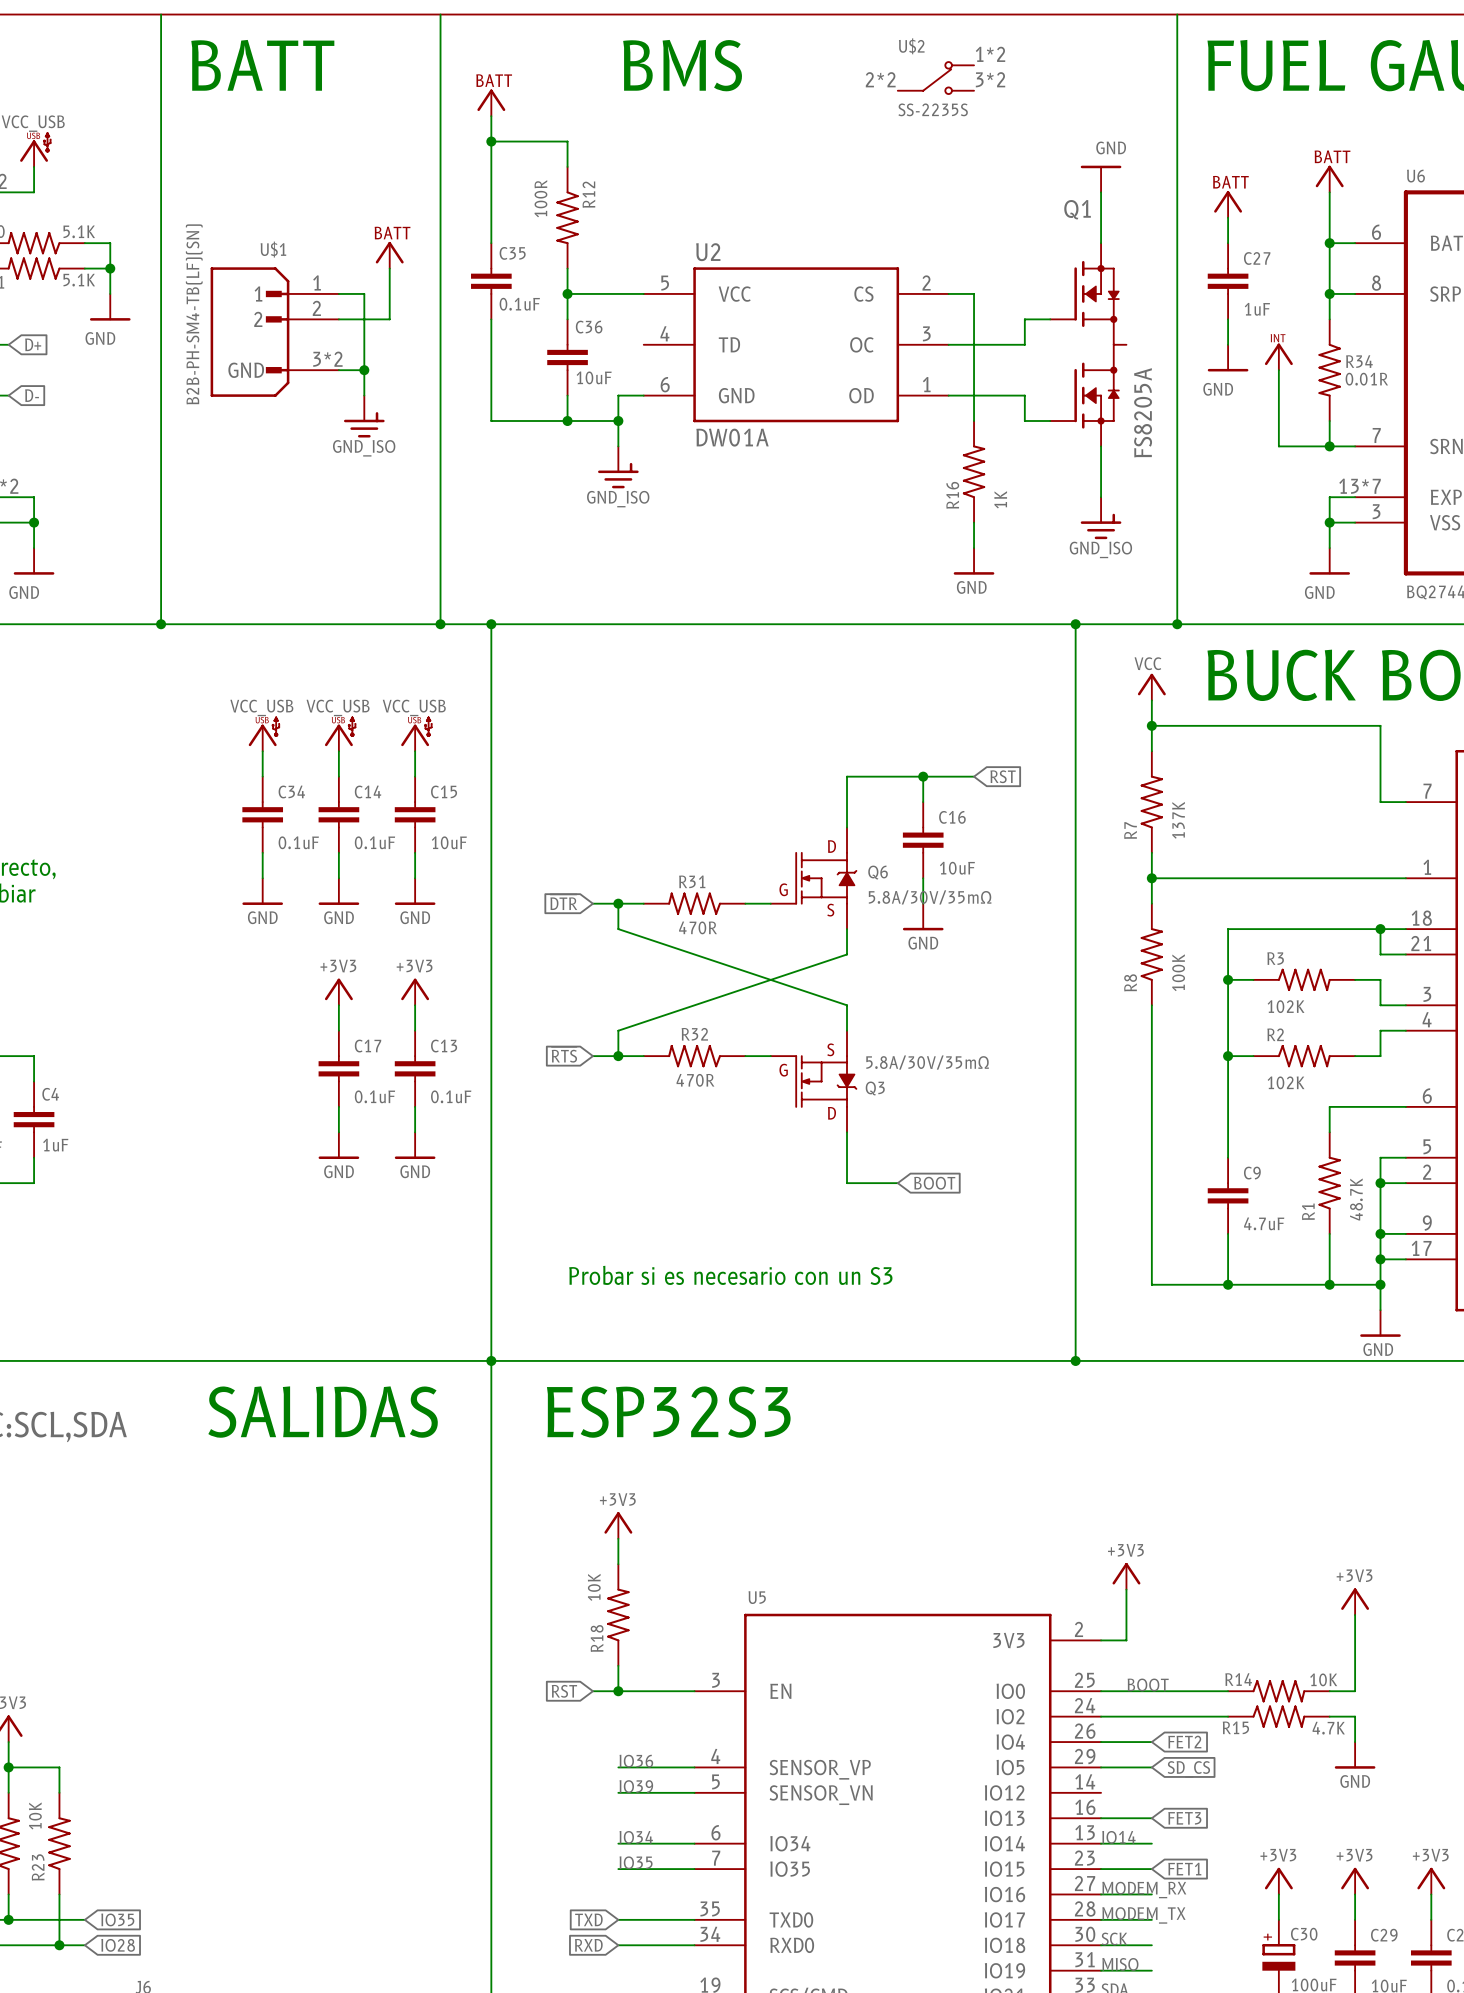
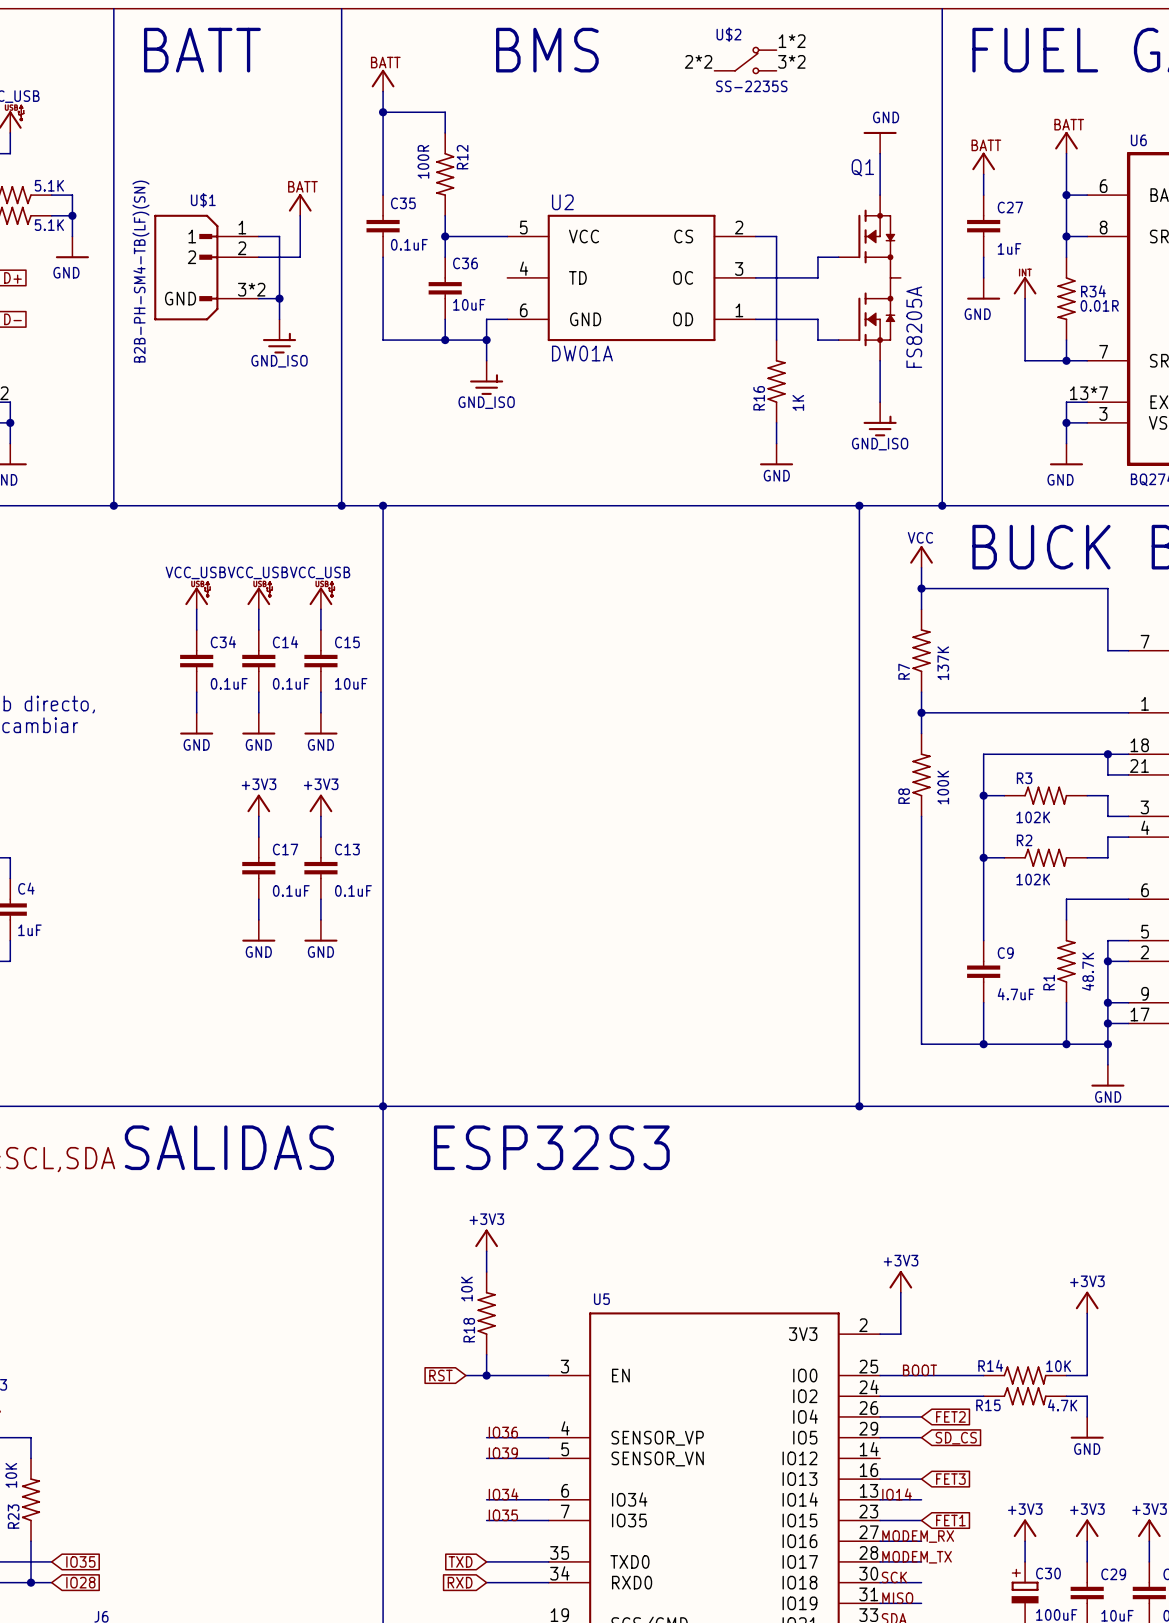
wire: (923, 776) (923, 802) -> none
junction: (923, 776) -> none
wire: (974, 776) (847, 776) (847, 827) -> none
global label: RST (1003, 776) -> none
C16: 10uF (923, 840) -> none
Q6: 5.8A/30V/35mΩ (813, 878) -> none
wire: (923, 878) (923, 903) -> none
global label: ~{DTR} (563, 902) -> none
wire: (592, 903) (643, 903) -> none
wire: (618, 903) (618, 929) (847, 1005) (847, 1030) -> none
junction: (618, 903) -> none
R31: 470R (694, 903) -> none
wire: (745, 903) (770, 903) -> none
power symbol: GND (923, 917) -> none
wire: (847, 929) (847, 954) (618, 1030) (618, 1056) -> none
global label: ~{RTS} (564, 1054) -> none
wire: (592, 1056) (643, 1056) -> none
junction: (618, 1056) -> none
R32: 470R (694, 1056) -> none
wire: (745, 1056) (770, 1056) -> none
Q3: 5.8A/30V/35mΩ (813, 1081) -> none
wire: (847, 1132) (847, 1183) (897, 1183) -> none
global label: BOOT (934, 1183) -> none
text: Probar si es necesario con un S3 (730, 1275) -> none

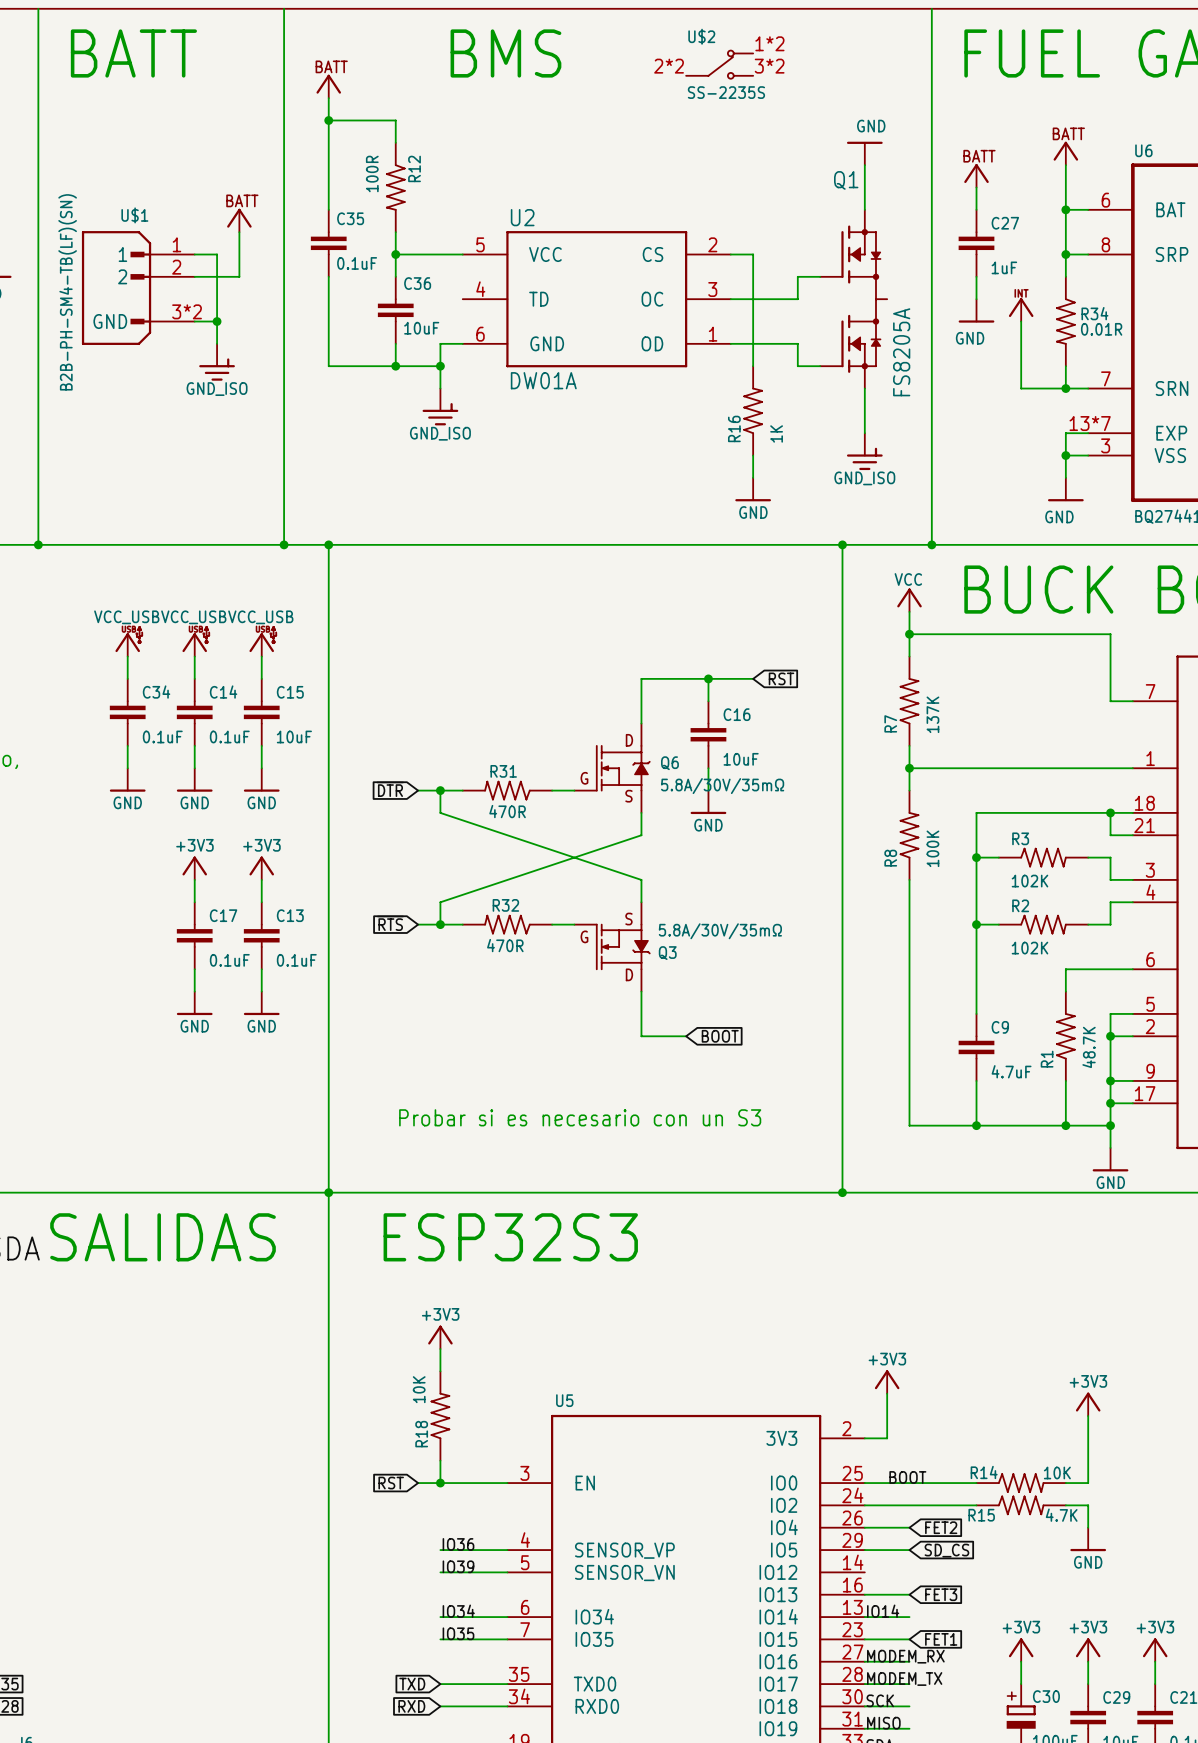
wire: none -> (708, 678) (708, 701)
junction: none -> (708, 678)
wire: none -> (753, 678) (641, 678) (641, 723)
global label: none -> RST (781, 678)
C16: none -> 10uF (708, 734)
Q6: none -> 5.8A/30V/35mΩ (612, 768)
wire: none -> (708, 768) (708, 790)
global label: none -> ~{DTR} (390, 789)
wire: none -> (418, 790) (462, 790)
wire: none -> (440, 790) (440, 812) (641, 879) (641, 902)
junction: none -> (440, 790)
R31: none -> 470R (507, 790)
wire: none -> (552, 790) (574, 790)
power symbol: none -> GND (708, 802)
wire: none -> (641, 812) (641, 835) (440, 902) (440, 924)
global label: none -> ~{RTS} (390, 923)
wire: none -> (418, 924) (462, 924)
junction: none -> (440, 924)
R32: none -> 470R (507, 924)
wire: none -> (552, 924) (574, 924)
Q3: none -> 5.8A/30V/35mΩ (612, 946)
wire: none -> (641, 991) (641, 1036) (686, 1036)
global label: none -> BOOT (720, 1036)
text: none -> Probar si es necesario con un S3 (580, 1117)

